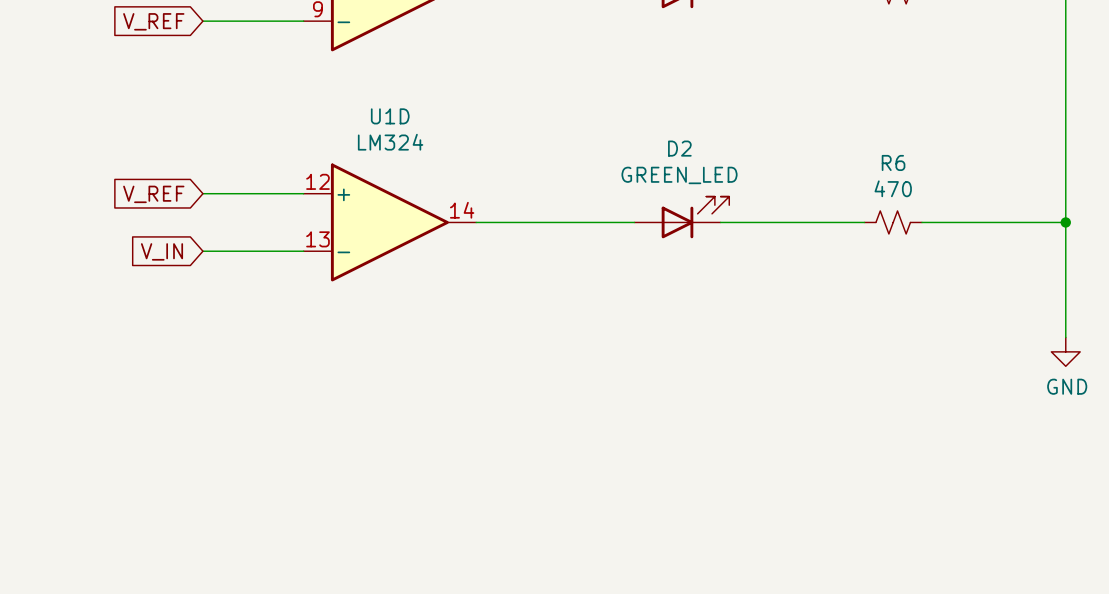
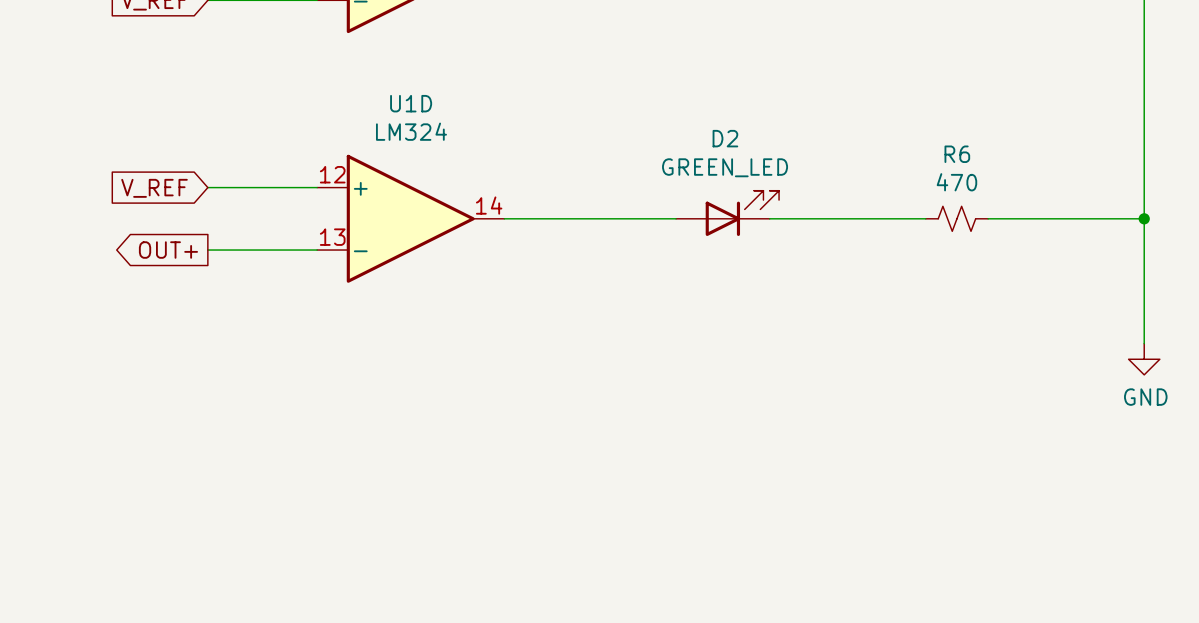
global label shape: input (162, 251) -> output (168, 250)
global label: V_IN (162, 251) -> OUT+ (168, 250)

